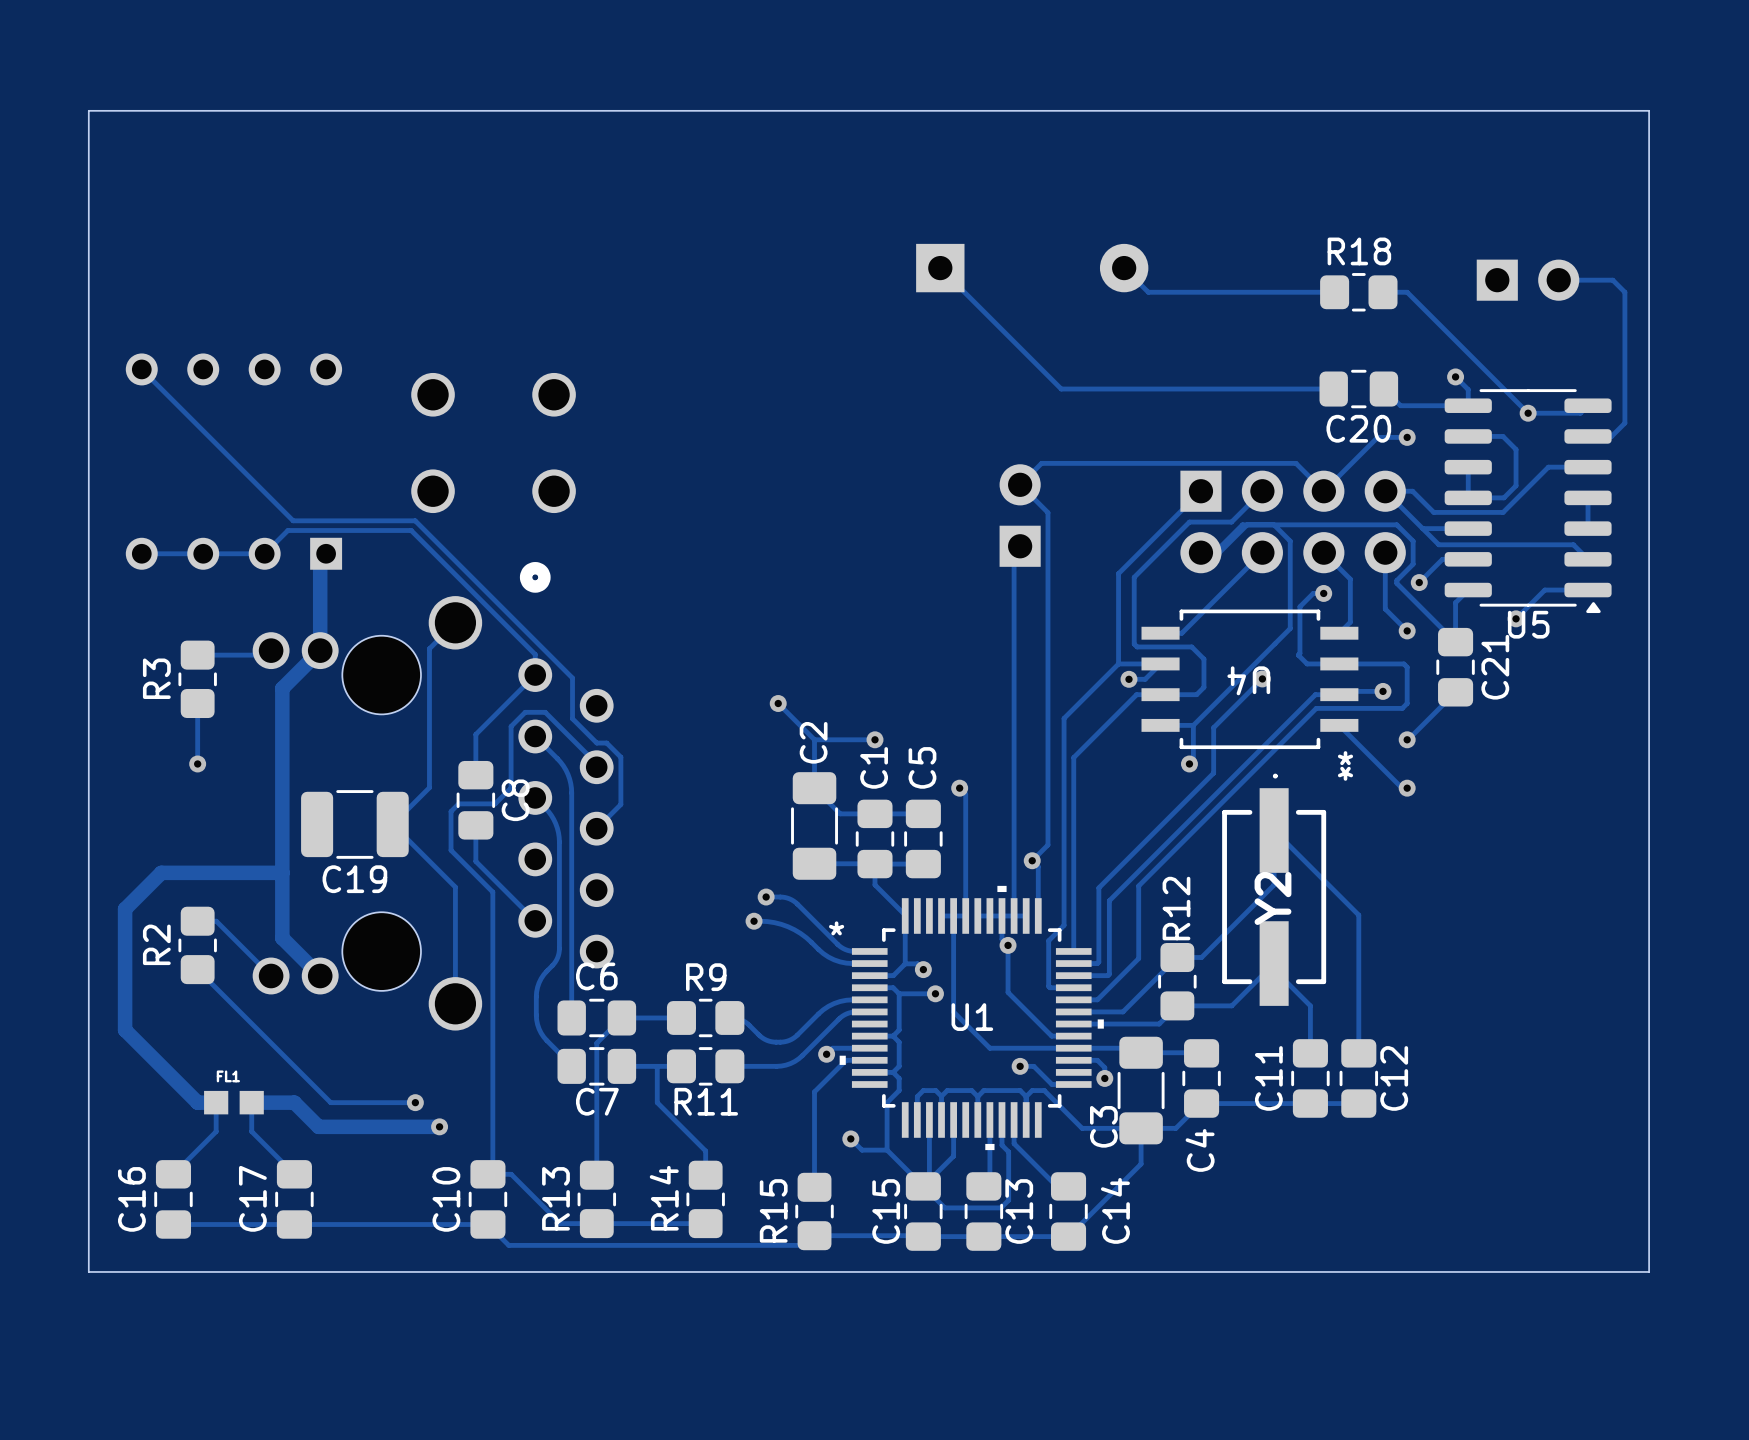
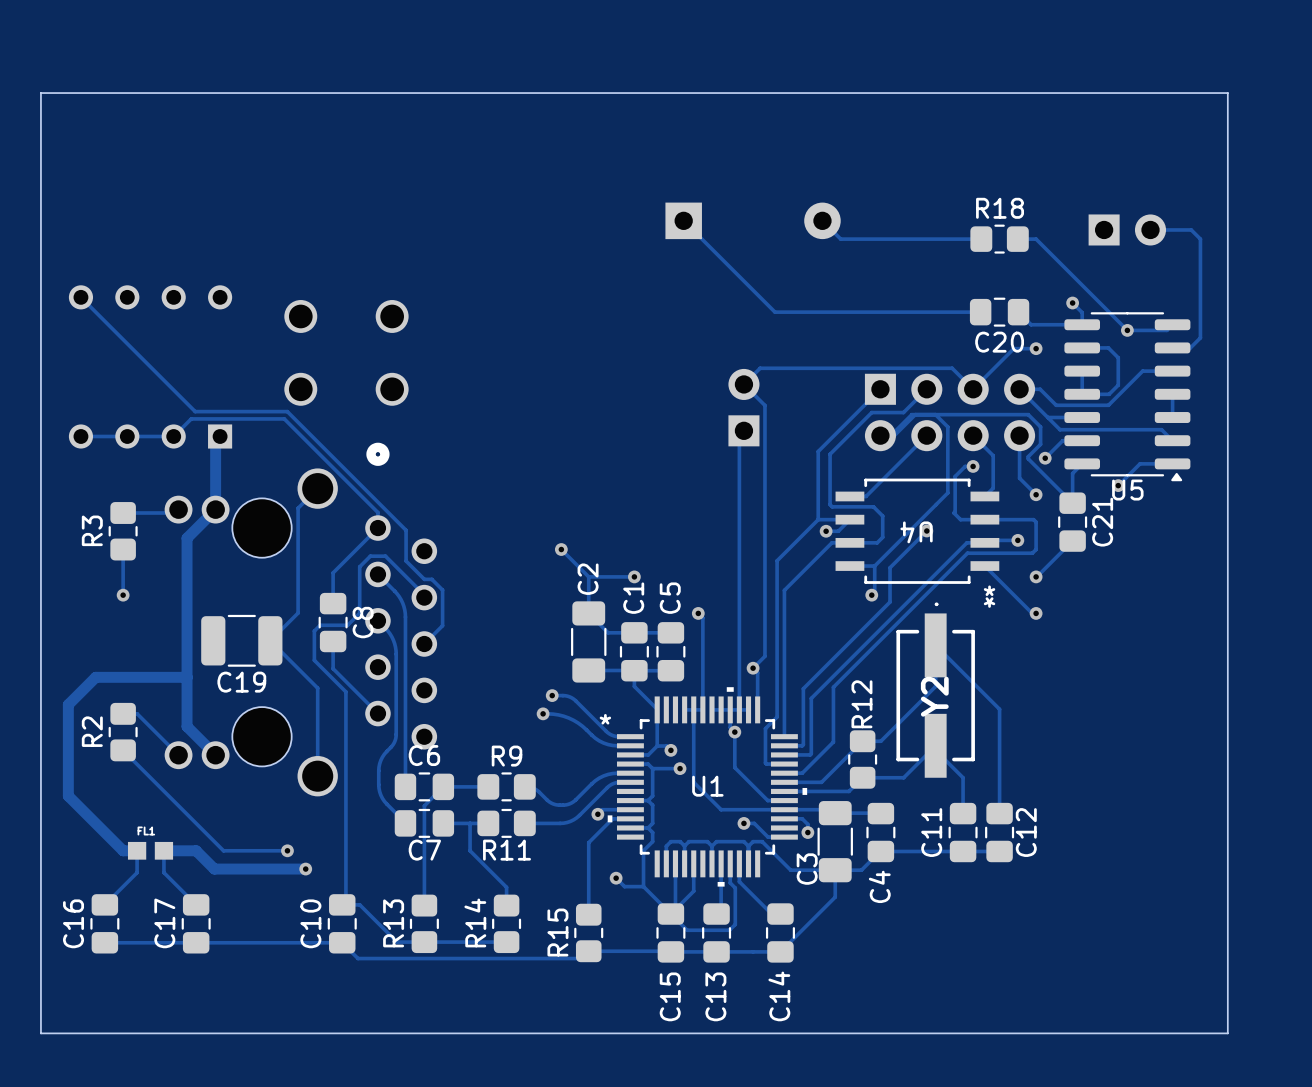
board edge: (88, 110) (1649, 110) (1649, 1271) (88, 1271) -> (40, 102) (40, 93) (1227, 93) (1227, 1033) (40, 1033) (40, 978)
C14 name position: C14 (1115, 1210) -> C14 (779, 996)
C15 name position: C15 (886, 1211) -> C15 (670, 996)
C13 name position: C13 (1019, 1211) -> C13 (715, 996)

